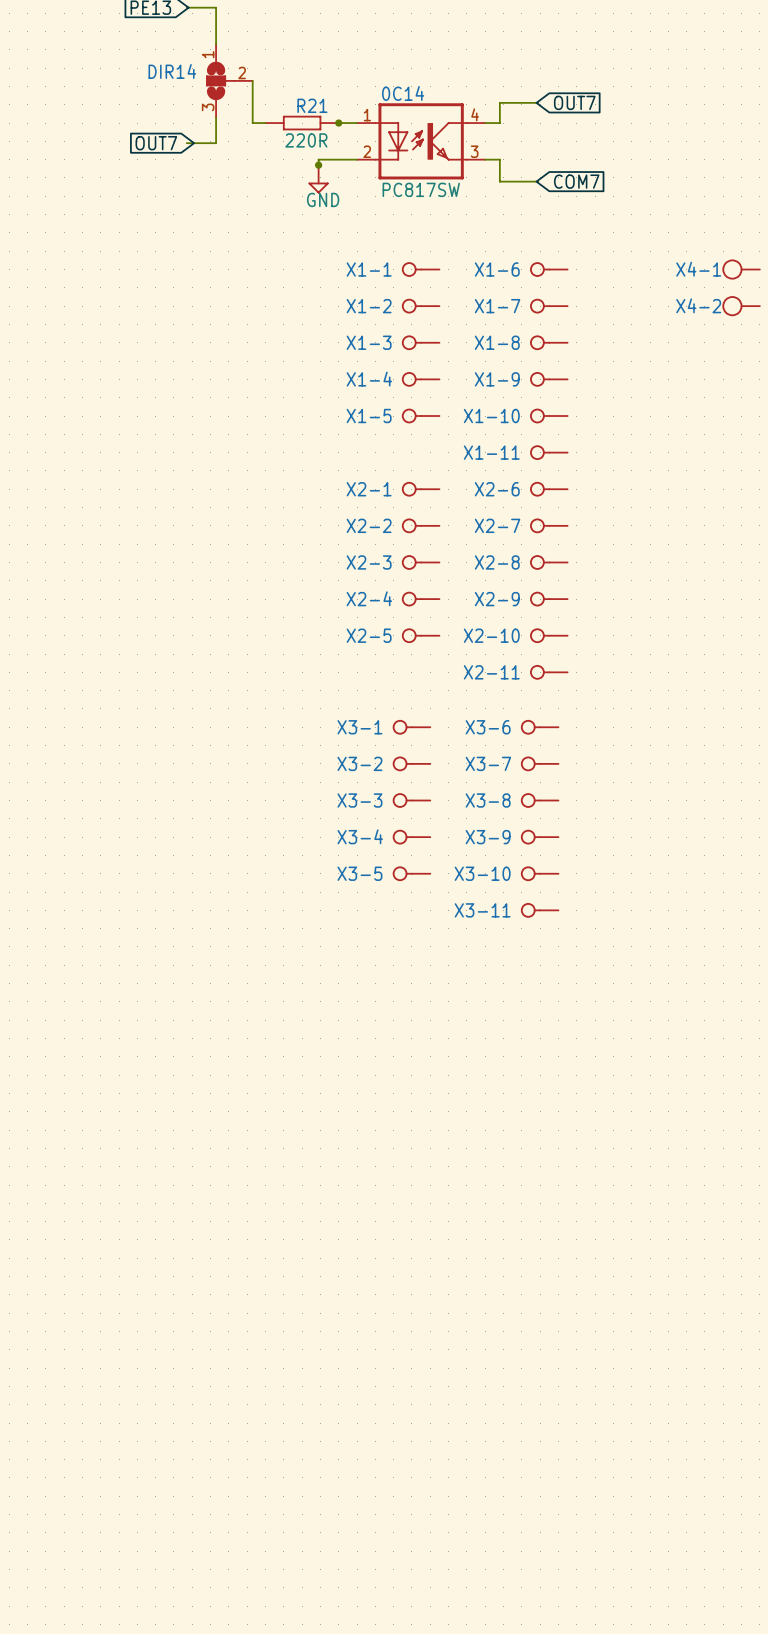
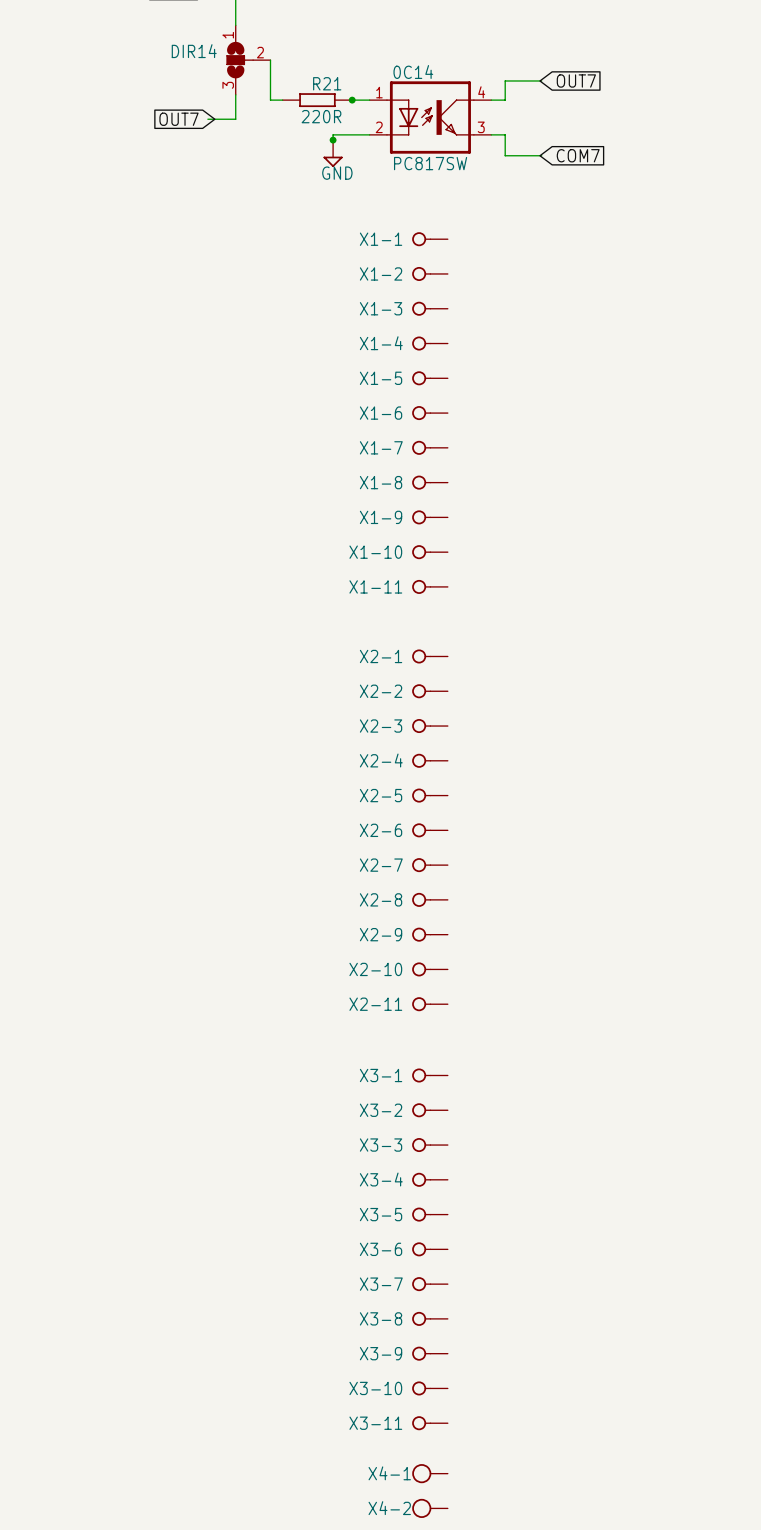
X1-6 position: (548, 269) -> (429, 413)
X4-1 position: (741, 269) -> (430, 1473)
X1-7: (548, 306) -> none
X4-2 position: (741, 306) -> (430, 1508)
X1-8: (548, 342) -> none
X1-9: (548, 379) -> none
X1-10: (548, 416) -> none
X1-11: (548, 452) -> none
X2-1 name: X2-1 (369, 489) -> X1-7 (381, 447)
X2-6 position: (548, 489) -> (429, 830)
X2-2 name: X2-2 (369, 525) -> X1-8 (381, 482)
X2-7 position: (548, 525) -> (429, 865)
X2-3 name: X2-3 (369, 562) -> X1-9 (381, 517)
X2-8 position: (548, 562) -> (429, 899)
X2-4 name: X2-4 (369, 598) -> X1-10 (375, 552)
X2-9 position: (548, 599) -> (429, 934)
X2-5 name: X2-5 (369, 635) -> X1-11 (375, 586)
X2-10 position: (548, 635) -> (429, 969)
X2-11 position: (548, 672) -> (429, 1004)
X2-1: none -> (429, 656)
X3-1 position: (411, 727) -> (429, 1075)
X3-6 position: (539, 727) -> (429, 1249)
X2-2: none -> (429, 691)
X3-2 position: (411, 763) -> (429, 1110)
X3-7 position: (539, 763) -> (429, 1284)
X2-3: none -> (429, 726)
X3-3 position: (411, 800) -> (429, 1145)
X3-8 position: (539, 800) -> (429, 1318)
X2-4: none -> (429, 760)
X3-4 position: (411, 837) -> (429, 1179)
X3-9 position: (539, 837) -> (429, 1353)
X2-5: none -> (429, 795)
X3-5 position: (411, 873) -> (429, 1214)
X3-10 position: (539, 873) -> (429, 1388)
X3-11 position: (539, 910) -> (429, 1423)

